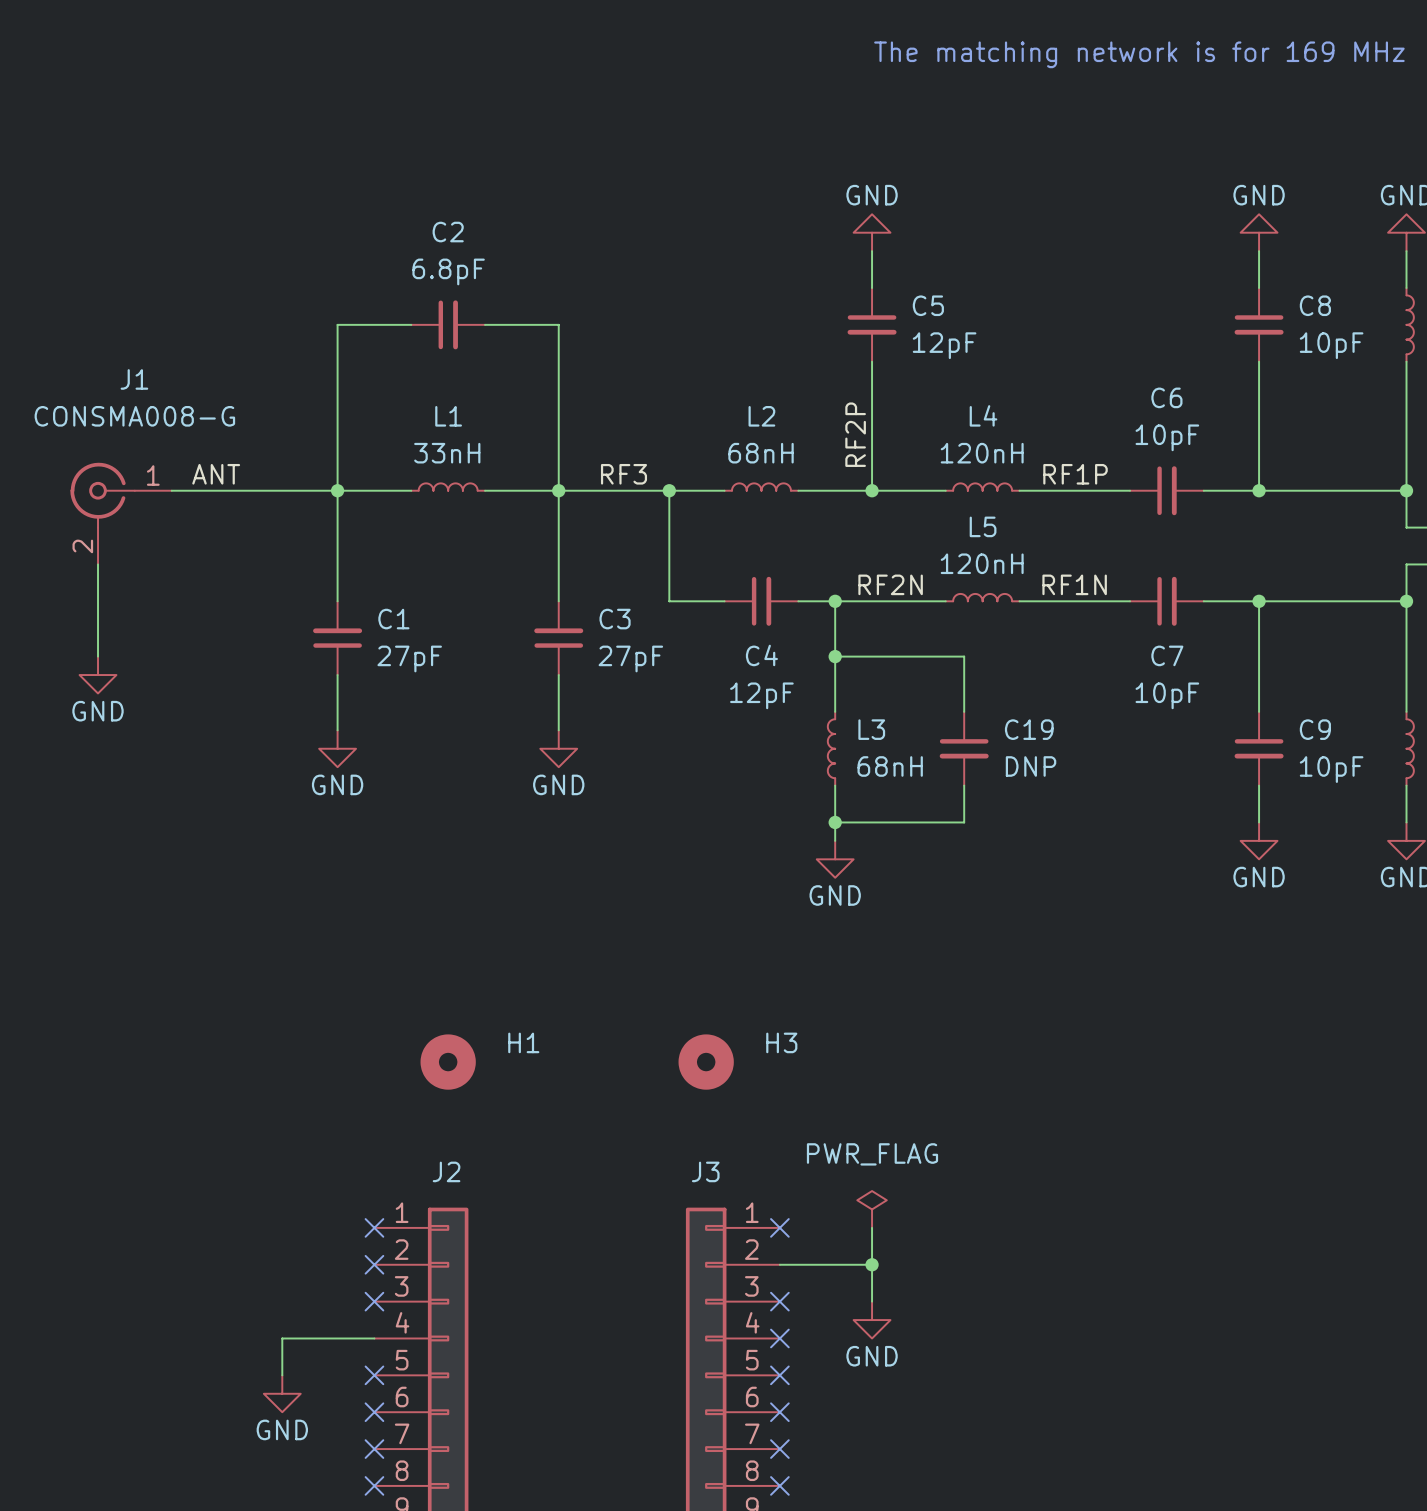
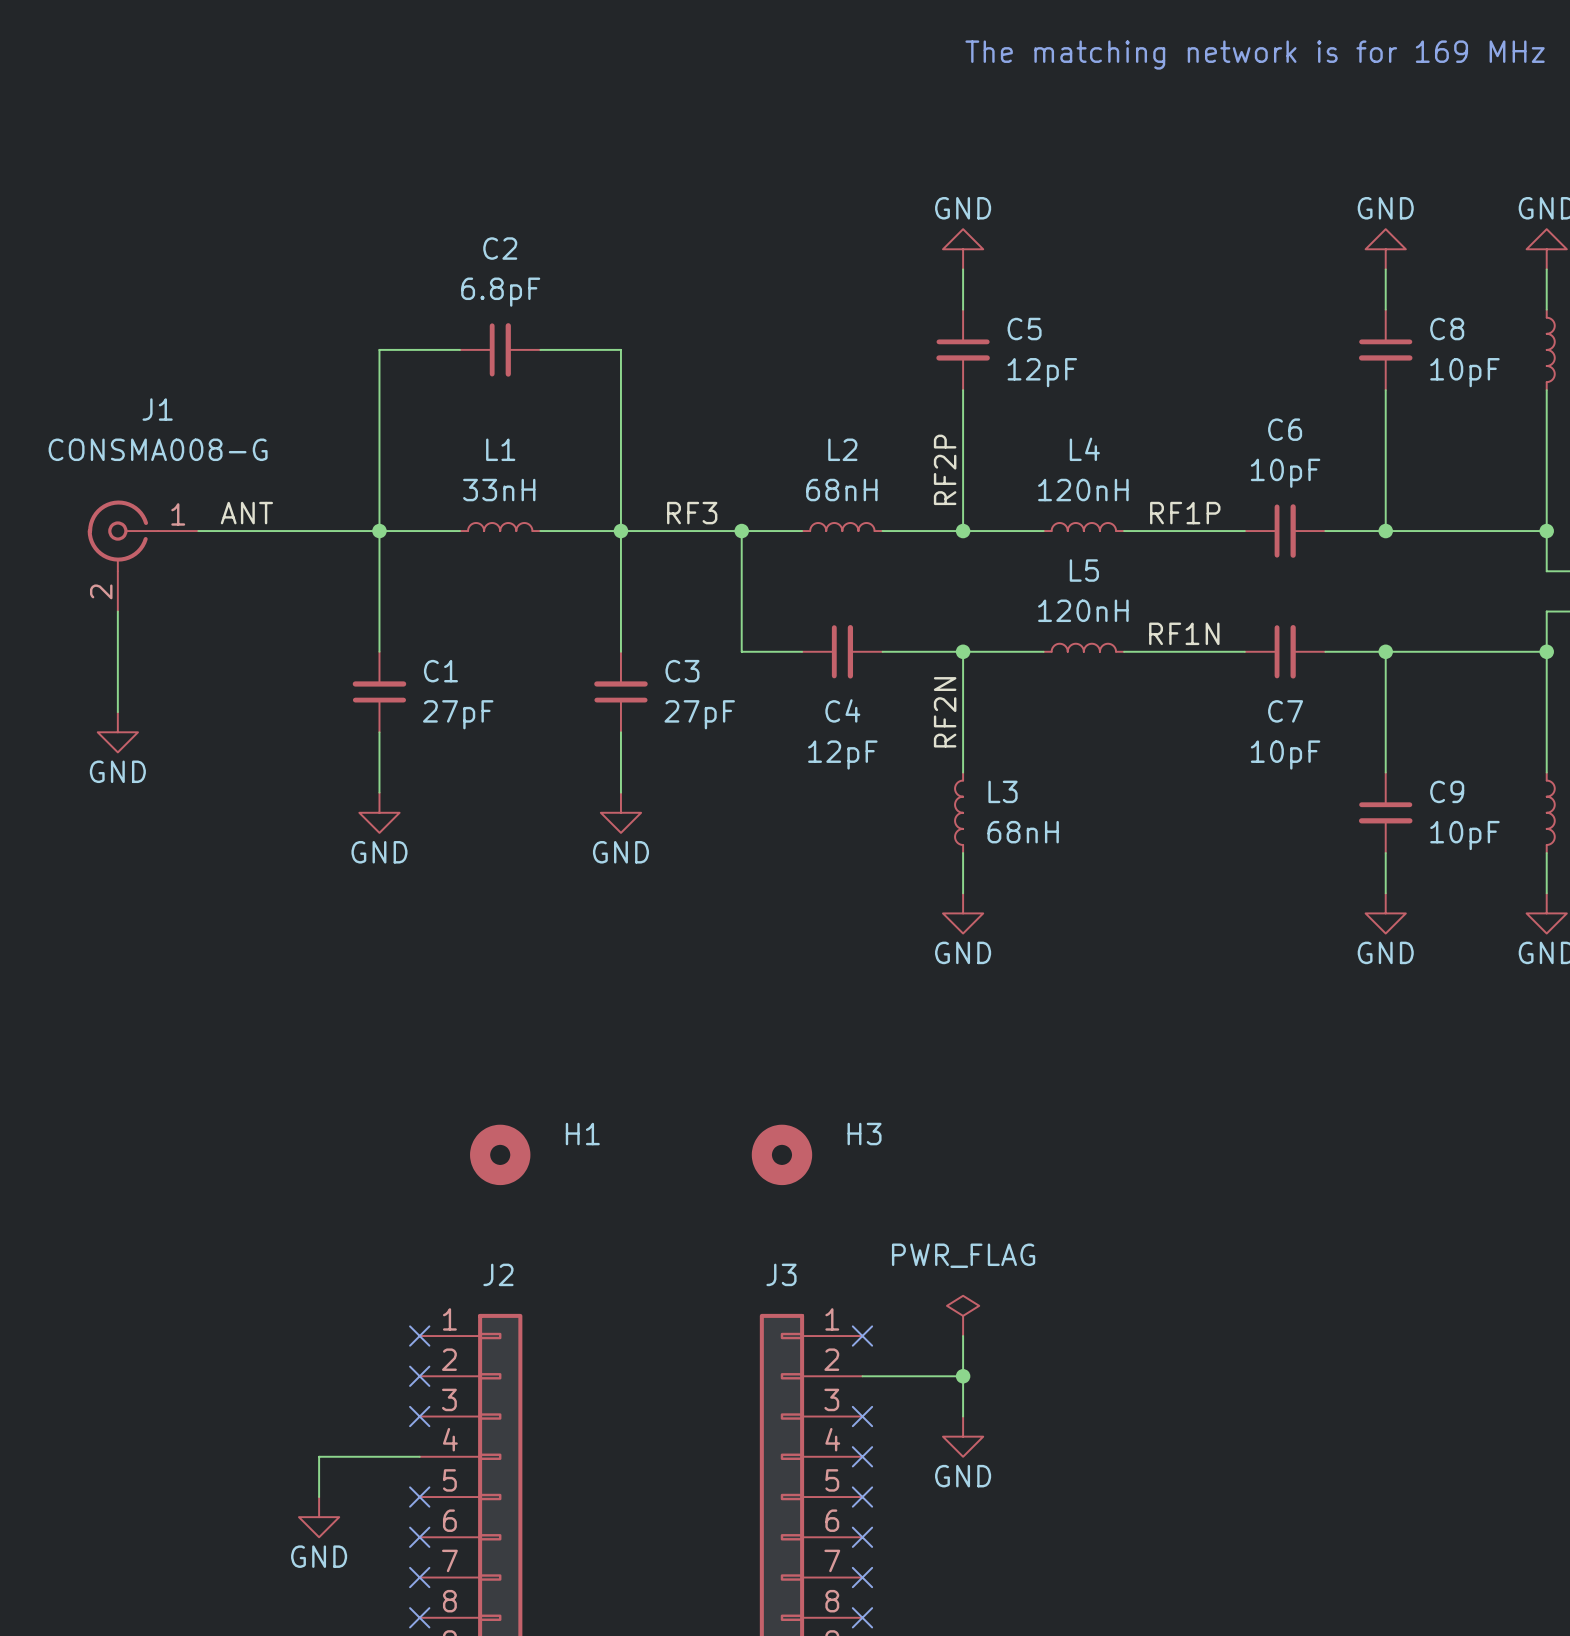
label rotation: 0° (890, 584) -> 90° counterclockwise (945, 712)
label position: RF2N (890, 584) -> RF2N (945, 712)
wire: (835, 601) (835, 711) -> (963, 651) (963, 772)
junction: (835, 601) -> none
junction: none -> (963, 651)
wire: (835, 656) (964, 656) (964, 711) -> none
junction: (835, 656) -> none
L3 position: (831, 748) -> (959, 812)
C19: DNP (964, 748) -> none
wire: (835, 785) (835, 840) -> none
wire: none -> (963, 853) (963, 893)
wire: (964, 785) (964, 822) (835, 822) -> none
junction: (835, 822) -> none
power symbol position: GND (835, 859) -> GND (963, 913)

